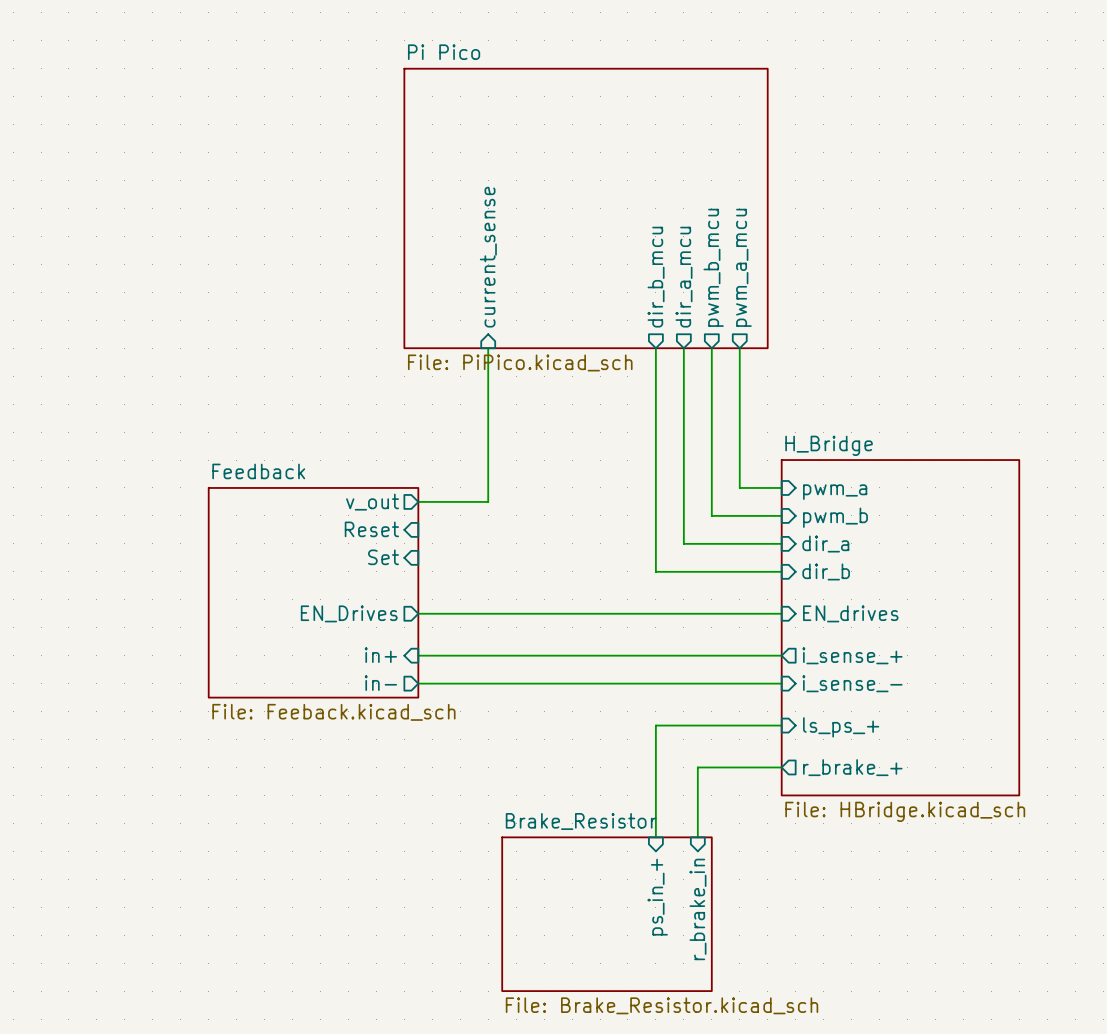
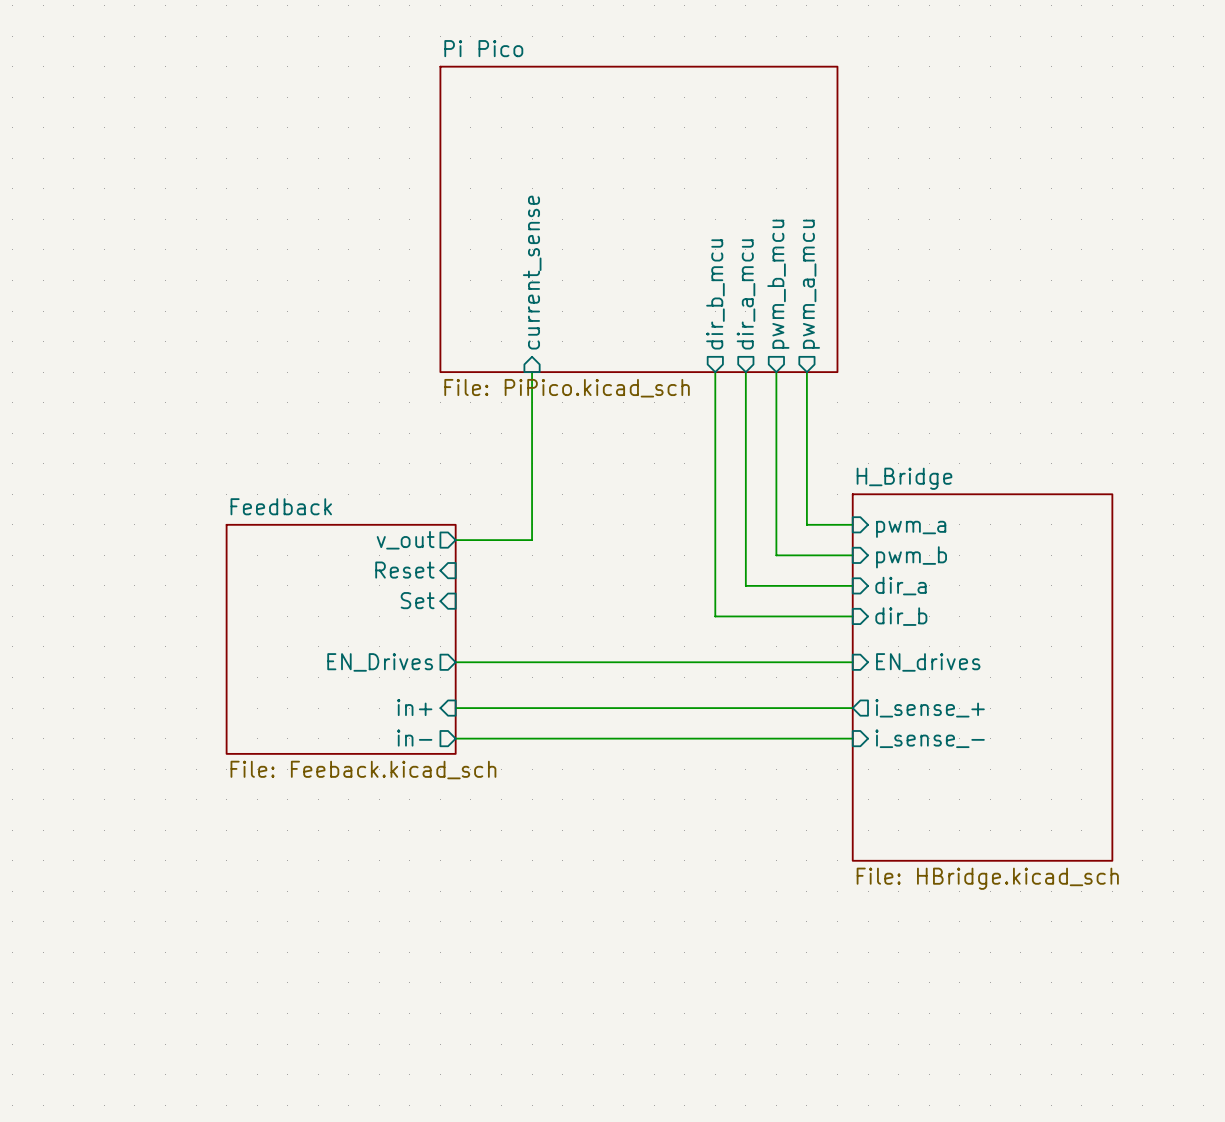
wire: (781, 725) (655, 725) (655, 837) -> none
sheet pin: ls_ps_+ (841, 727) -> none
wire: (781, 767) (697, 767) (697, 837) -> none
sheet pin: r_brake_+ (852, 767) -> none
sheet pin: ps_in_+ (657, 897) -> none
sheet pin: r_brake_in (697, 909) -> none
sheet Brake_Resistor: File: Brake_Resistor.kicad_sch (607, 914) -> none

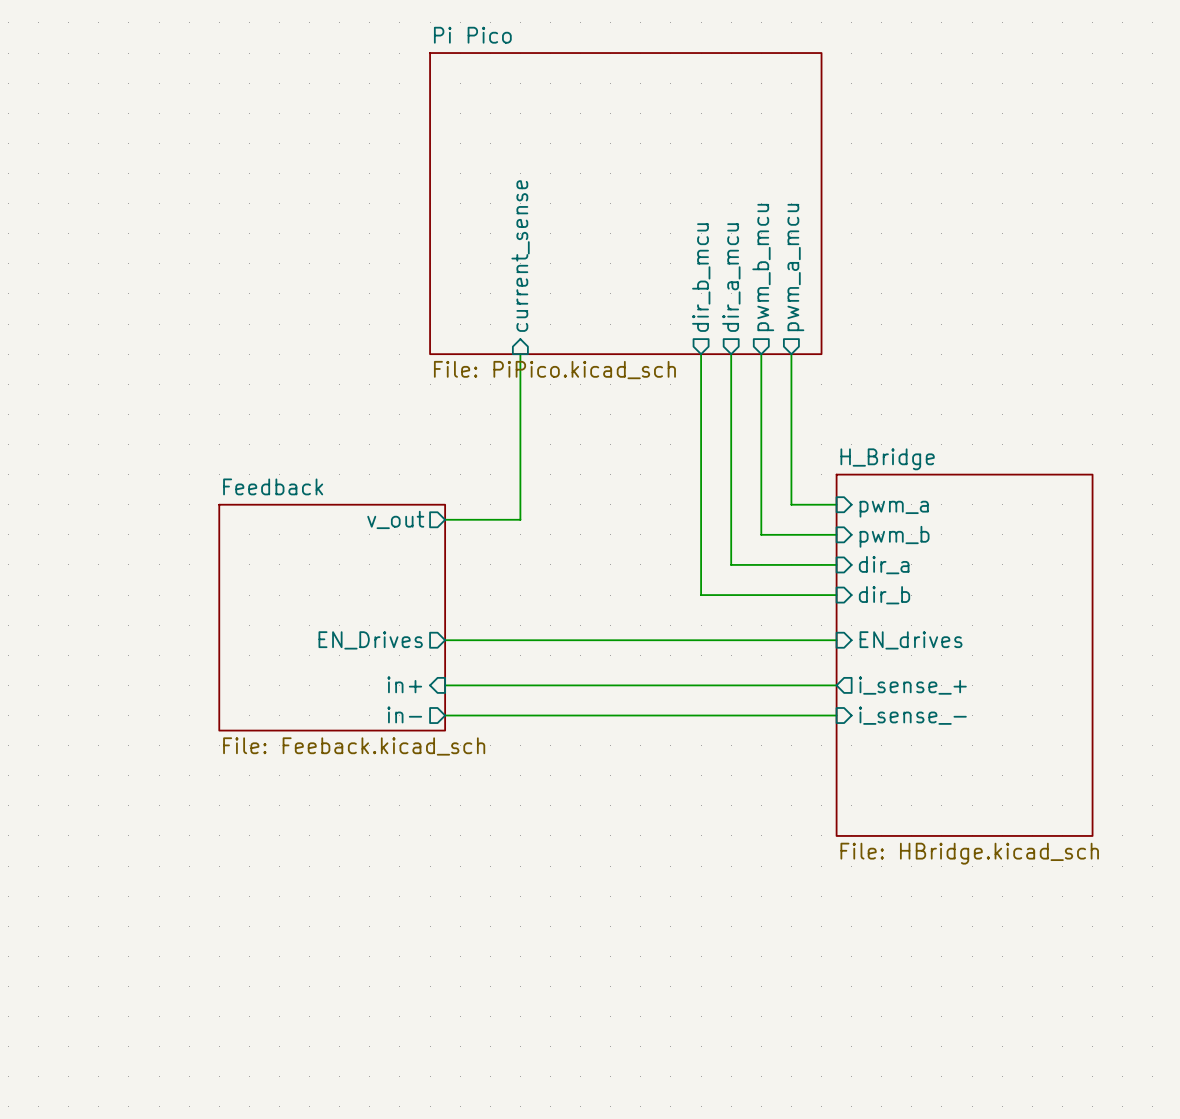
sheet pin: Reset (404, 570) -> none
sheet pin: Set (417, 600) -> none

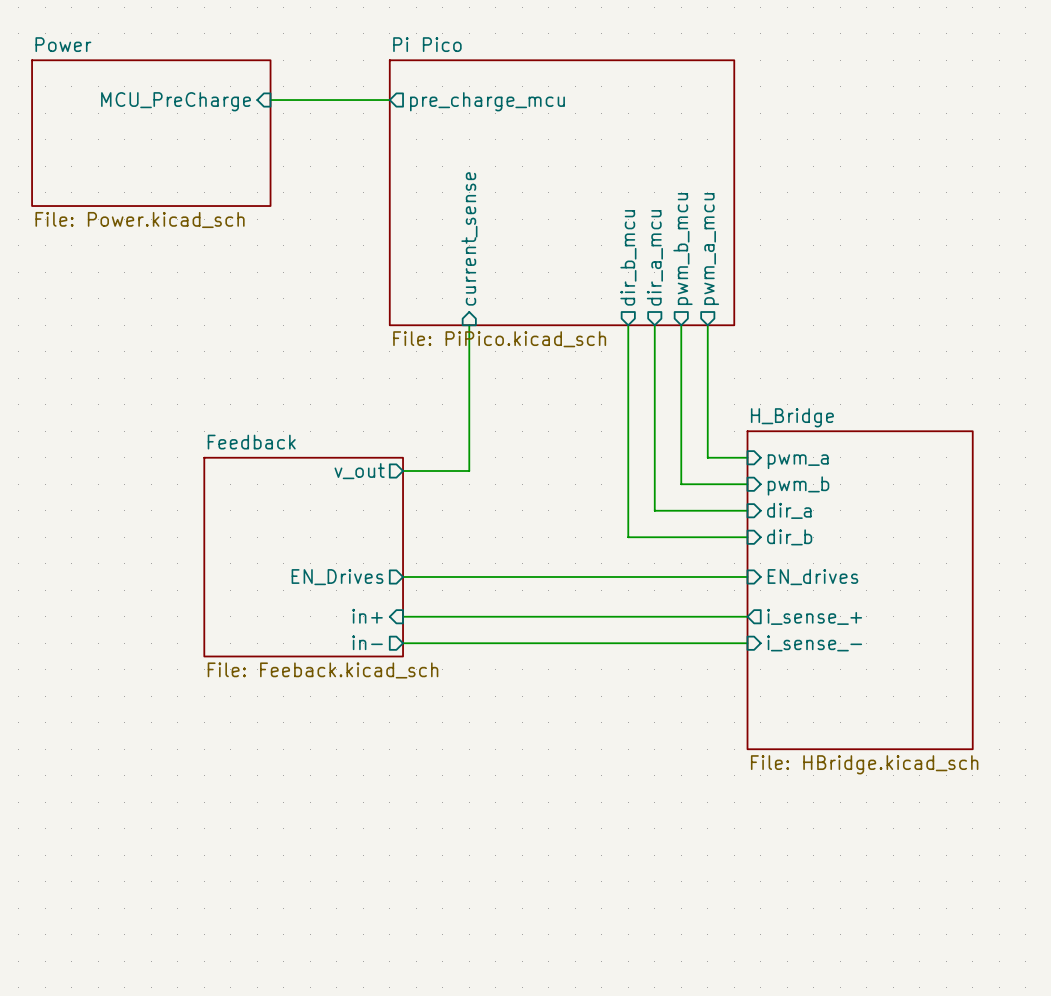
wire: none -> (270, 100) (389, 100)
sheet pin: none -> MCU_PreCharge (176, 101)
sheet pin: none -> pre_charge_mcu (487, 101)
sheet Power: none -> File: Power.kicad_sch (151, 133)

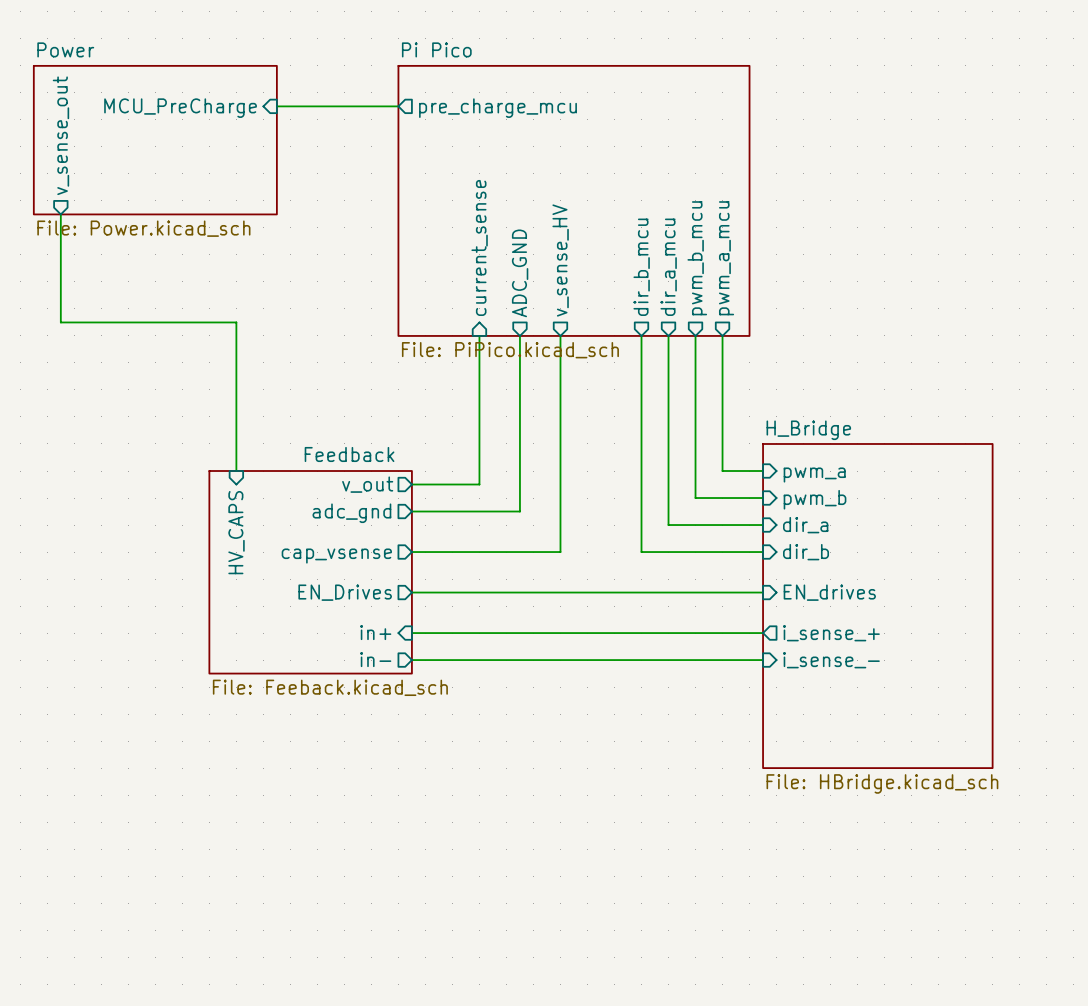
sheet pin: none -> v_sense_out (60, 135)
wire: none -> (60, 214) (60, 322) (236, 322) (236, 471)
sheet pin: none -> v_sense_HV (560, 260)
sheet pin: none -> ADC_GND (520, 273)
wire: none -> (519, 335) (519, 511) (411, 511)
wire: none -> (560, 335) (560, 552) (411, 552)
sheet Feedback name position: Feedback (251, 442) -> Feedback (349, 454)
sheet pin: none -> adc_gnd (351, 513)
sheet pin: none -> HV_CAPS (236, 532)
sheet pin: none -> cap_vsense (336, 556)

